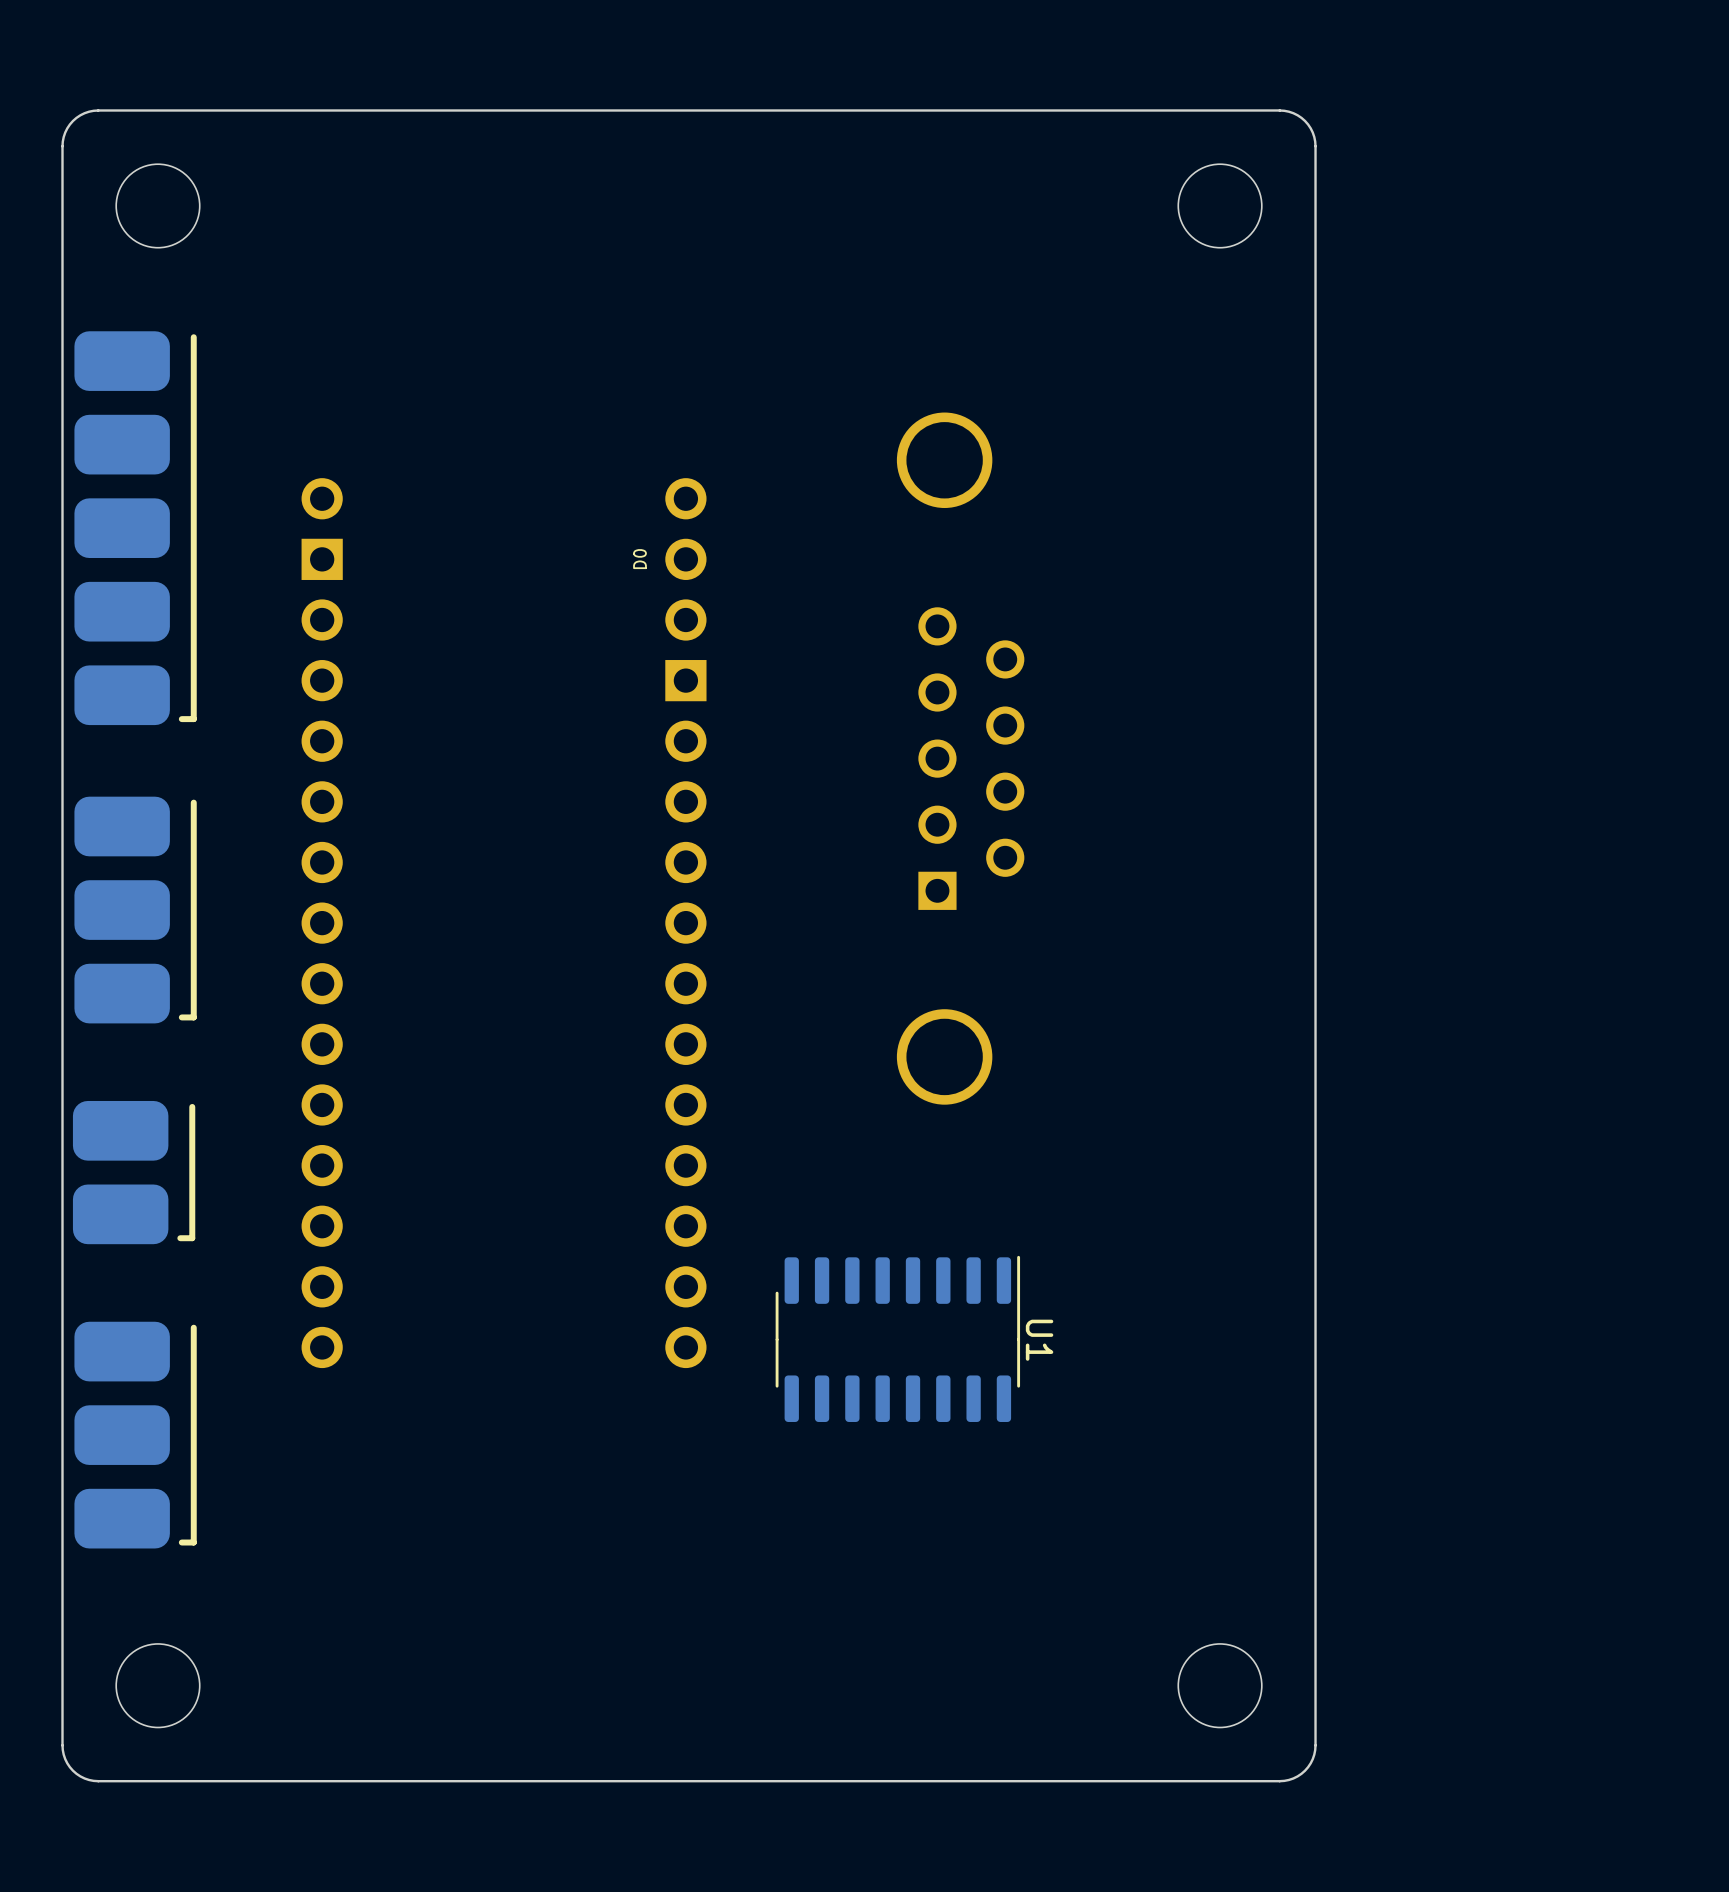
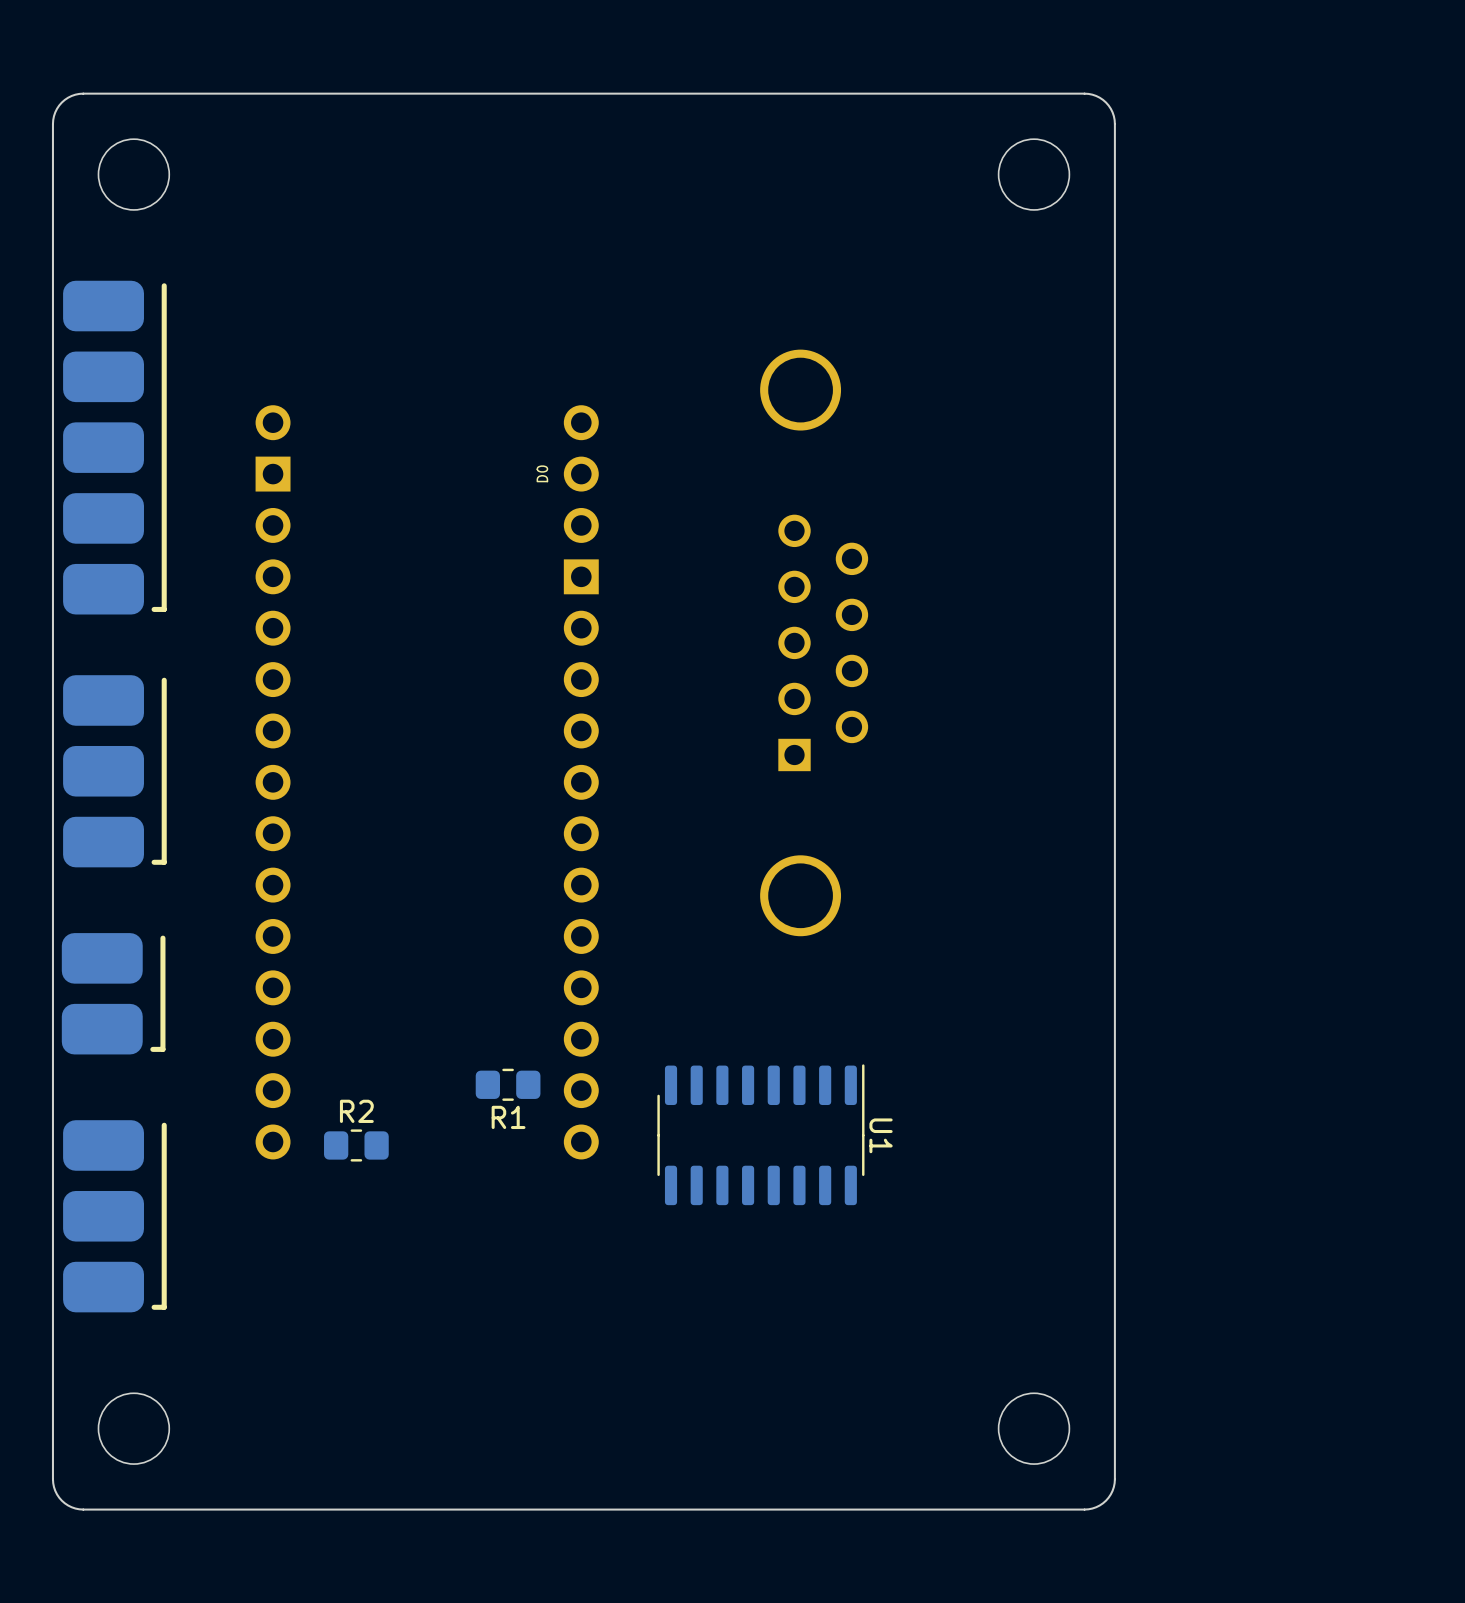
R1: none -> (508, 1084)
R2: none -> (356, 1145)

